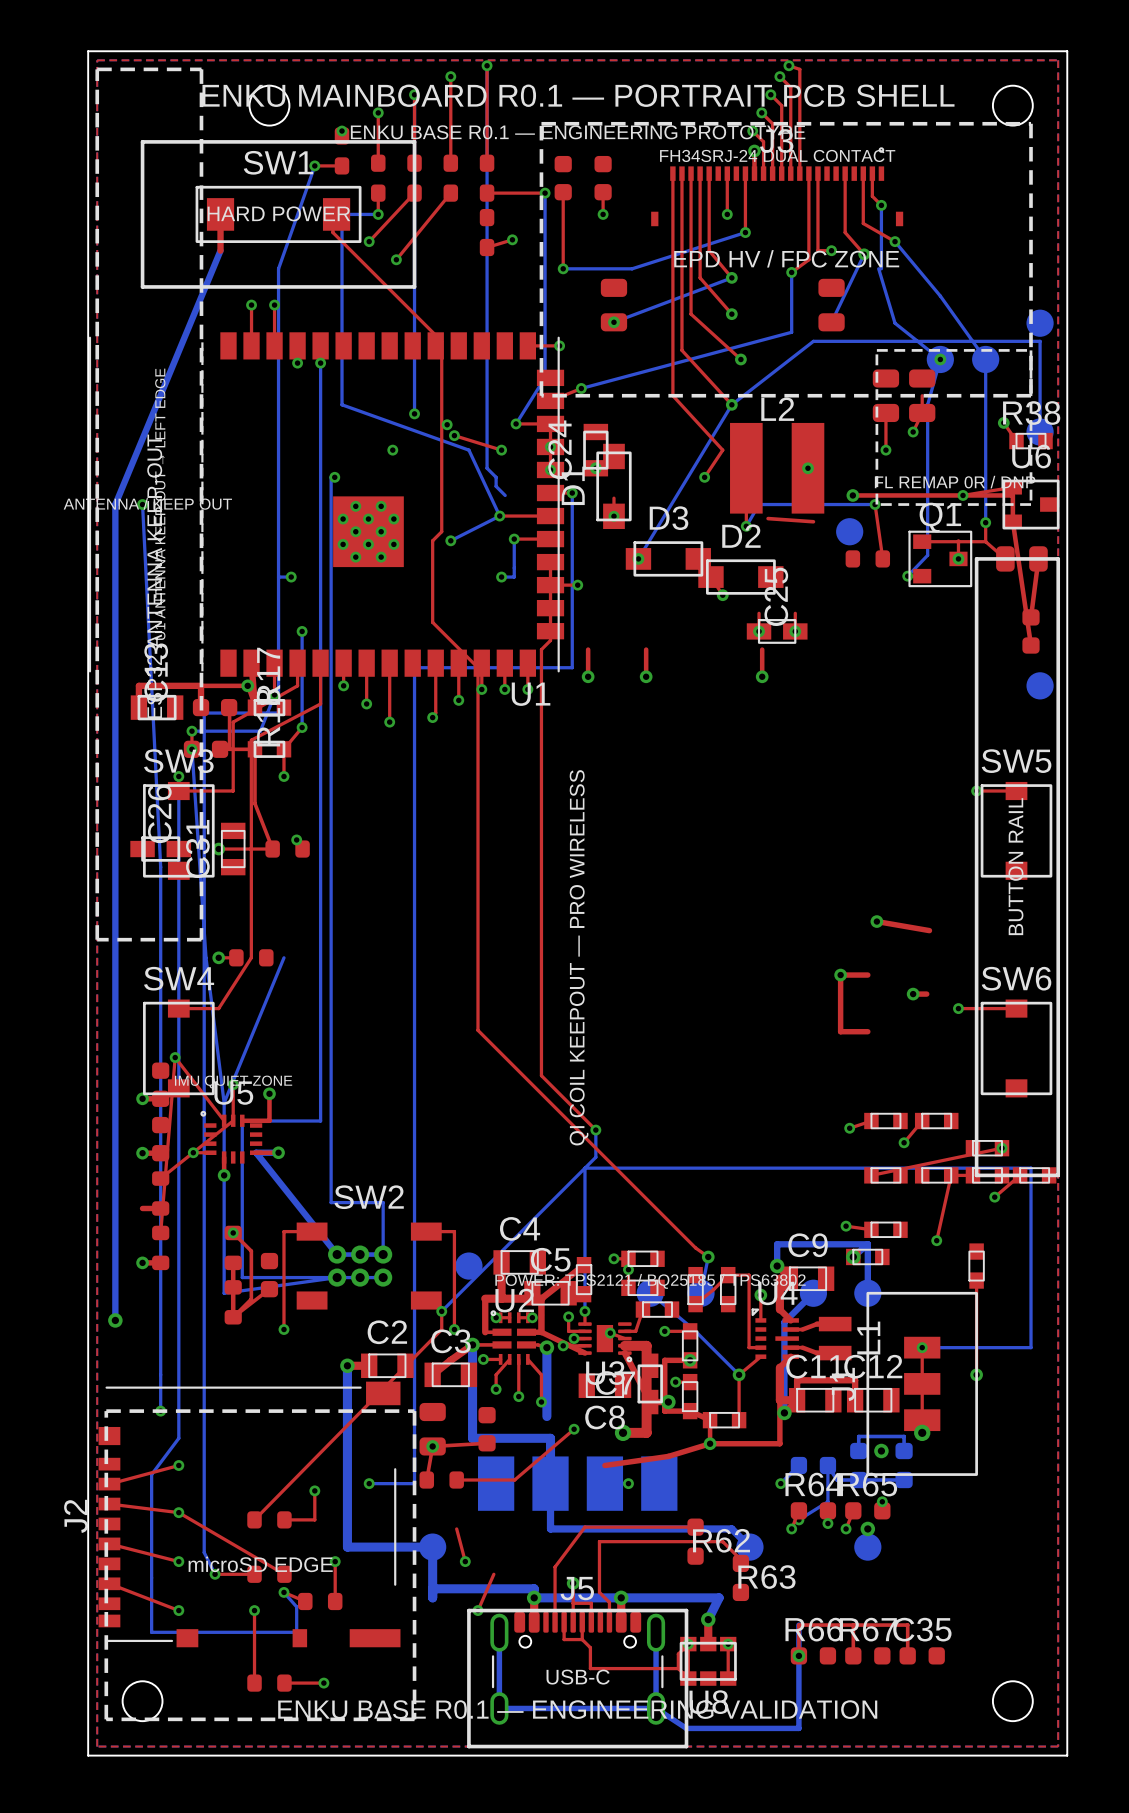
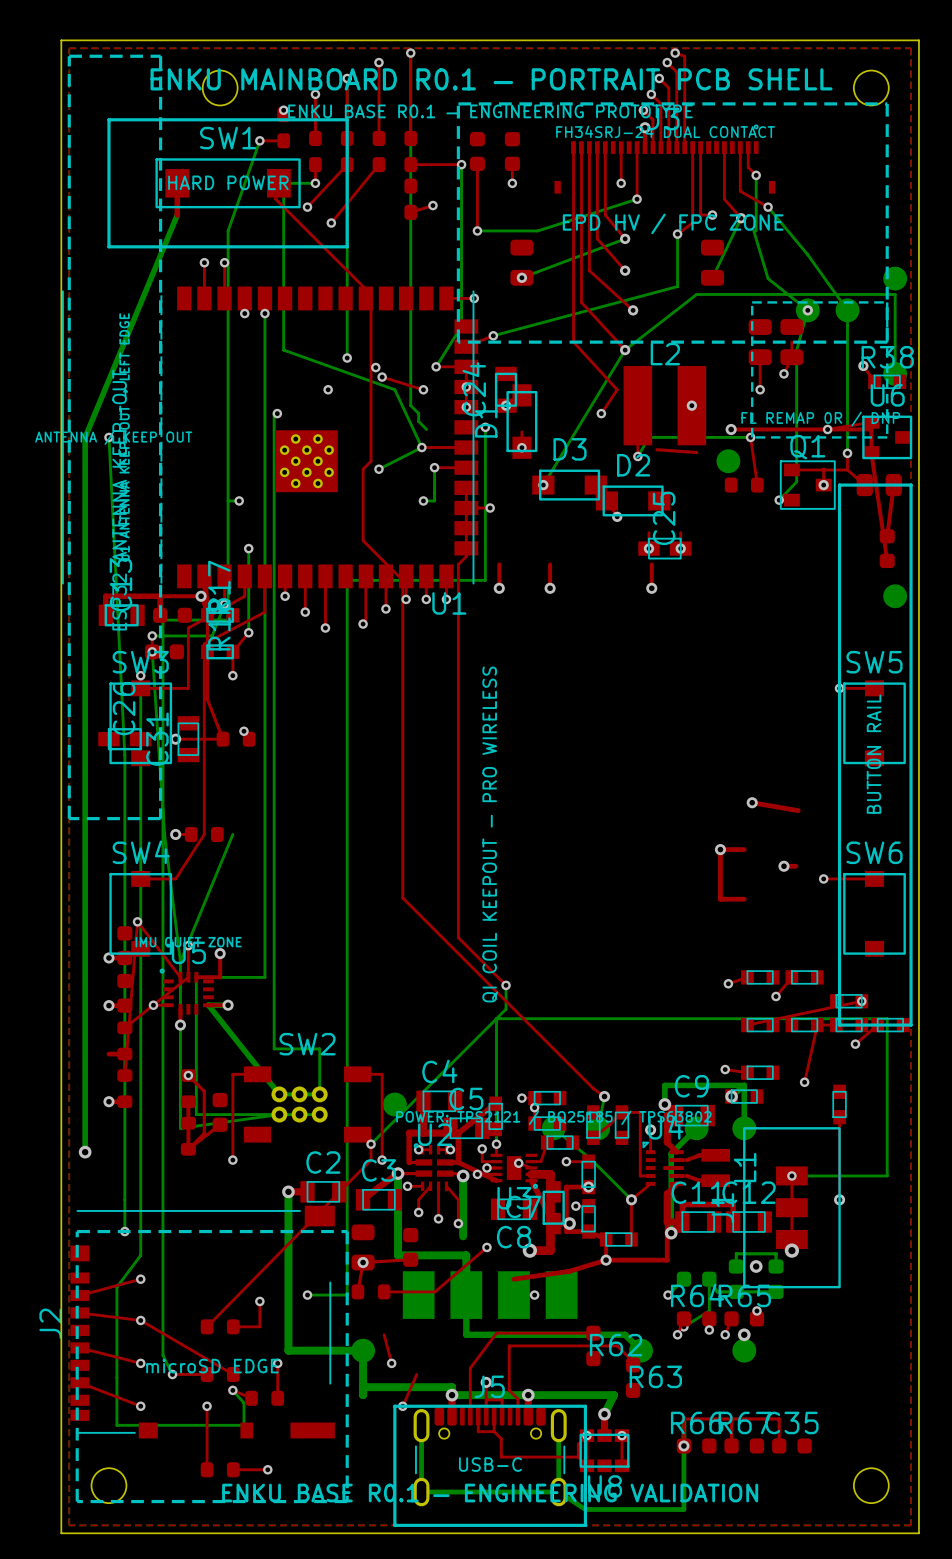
top track: (229, 707) (229, 749) (254, 749) -> (207, 615) (207, 651)

